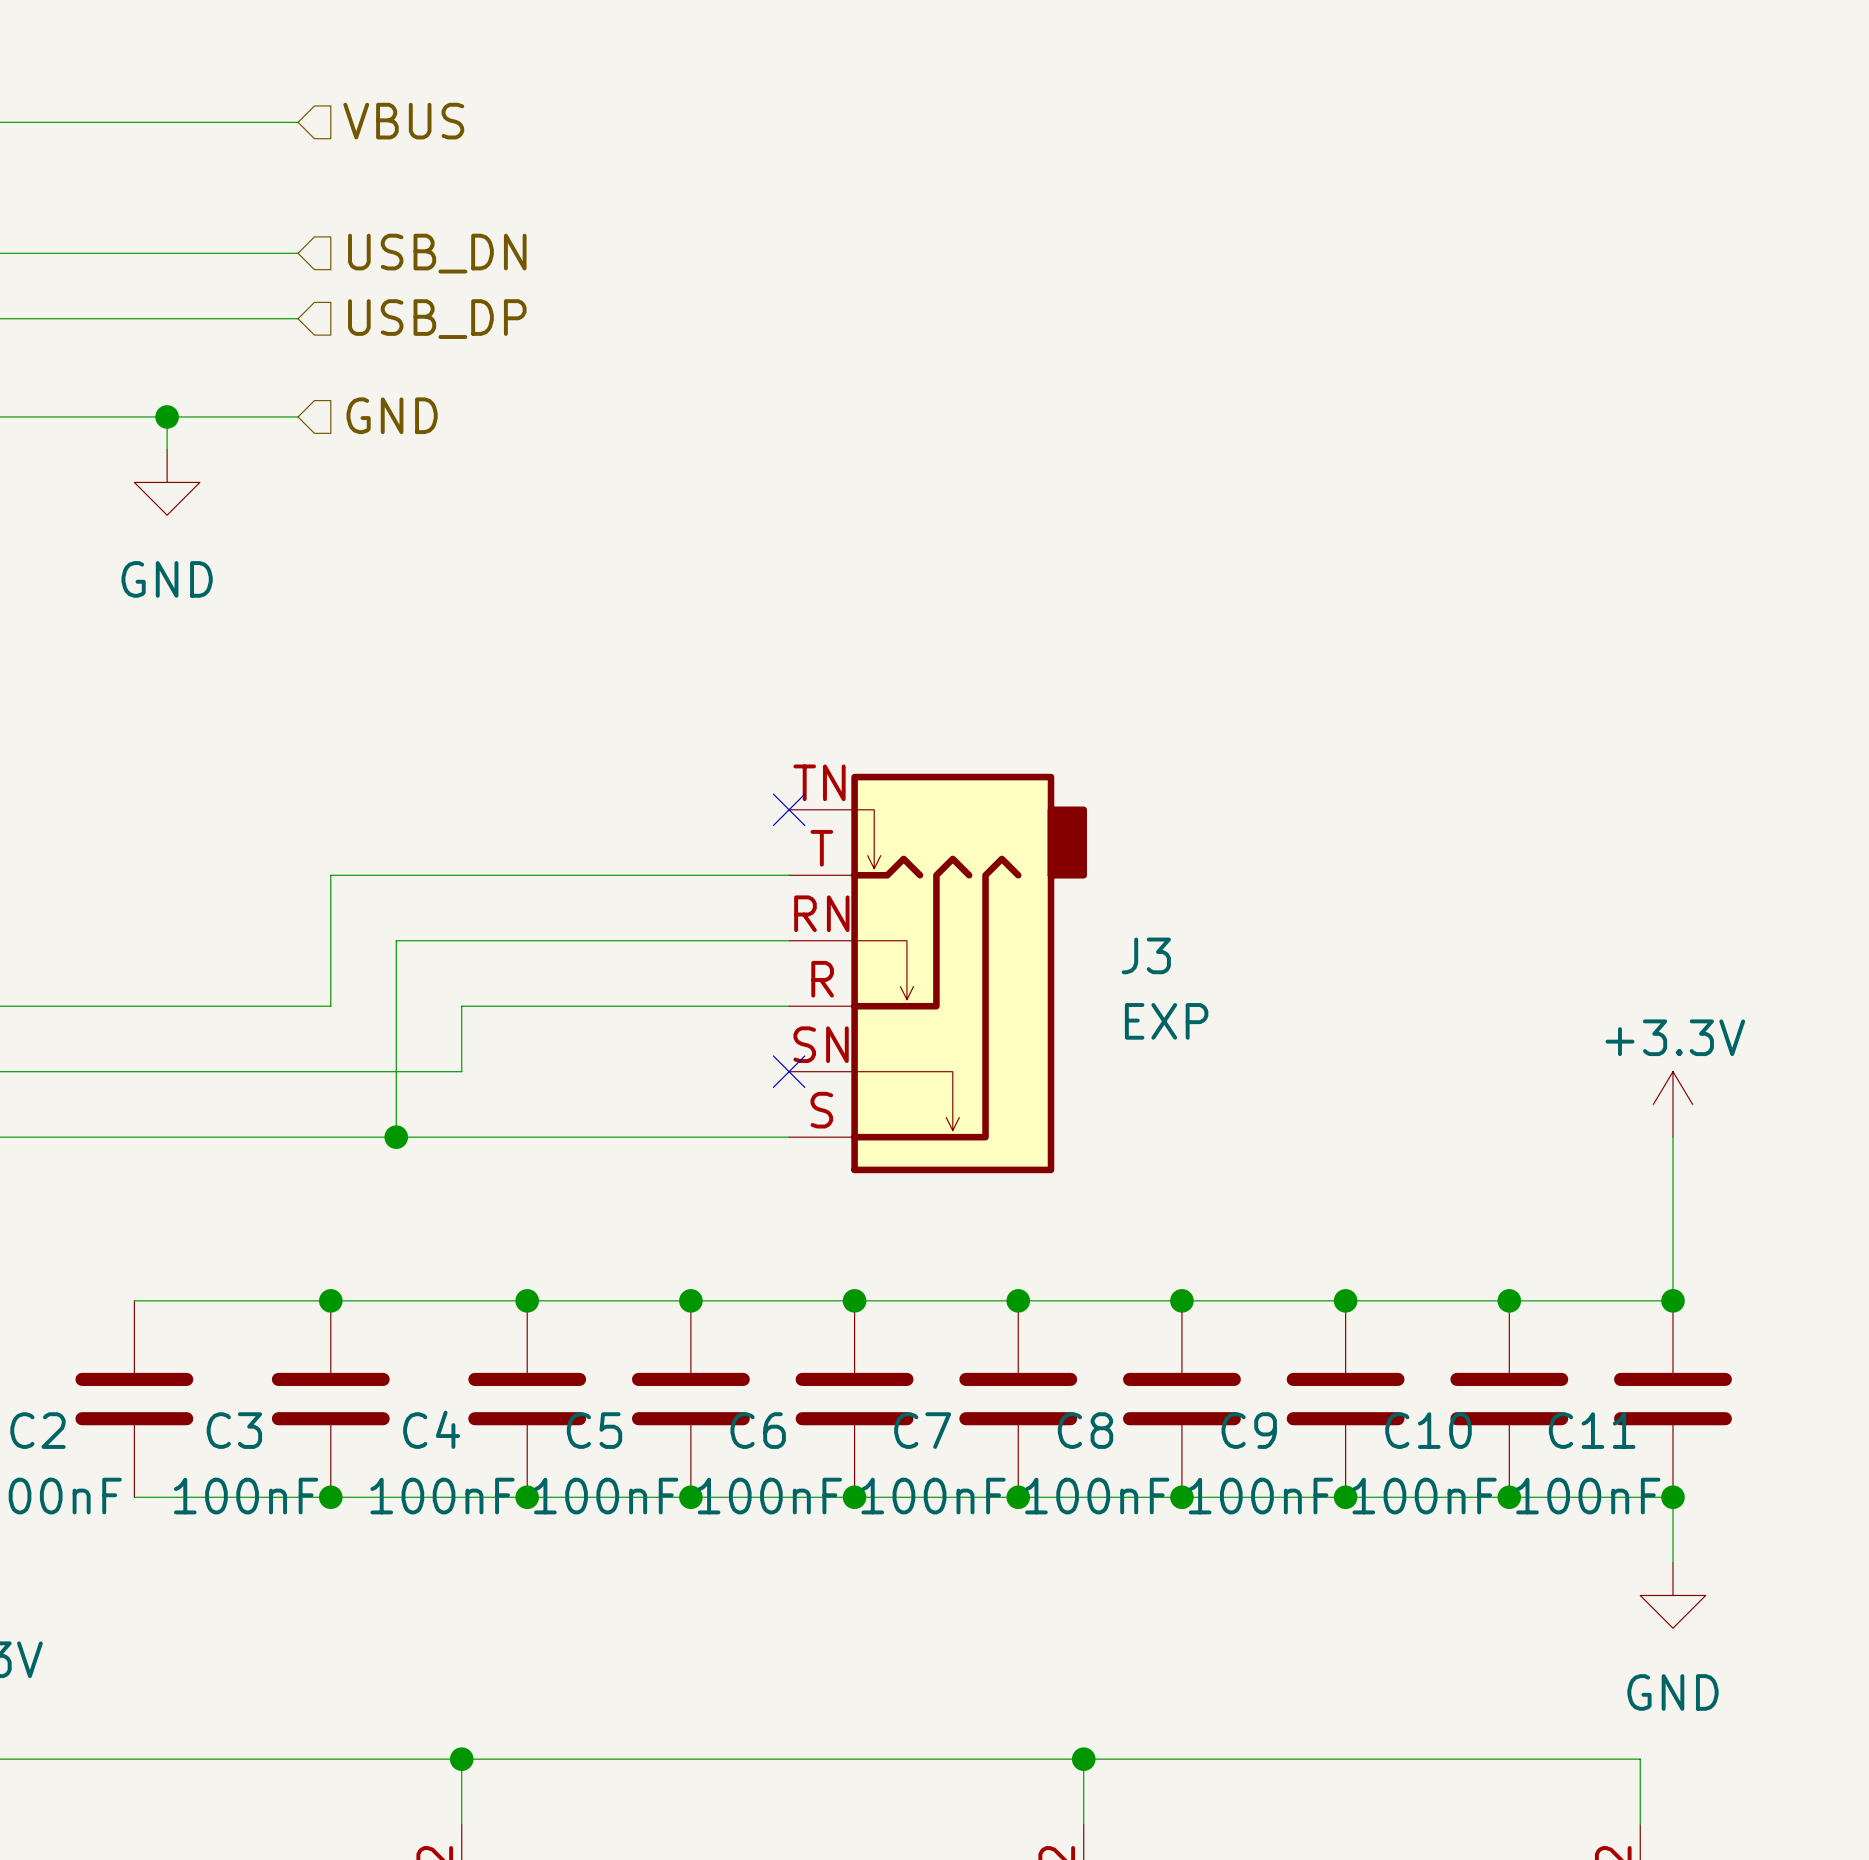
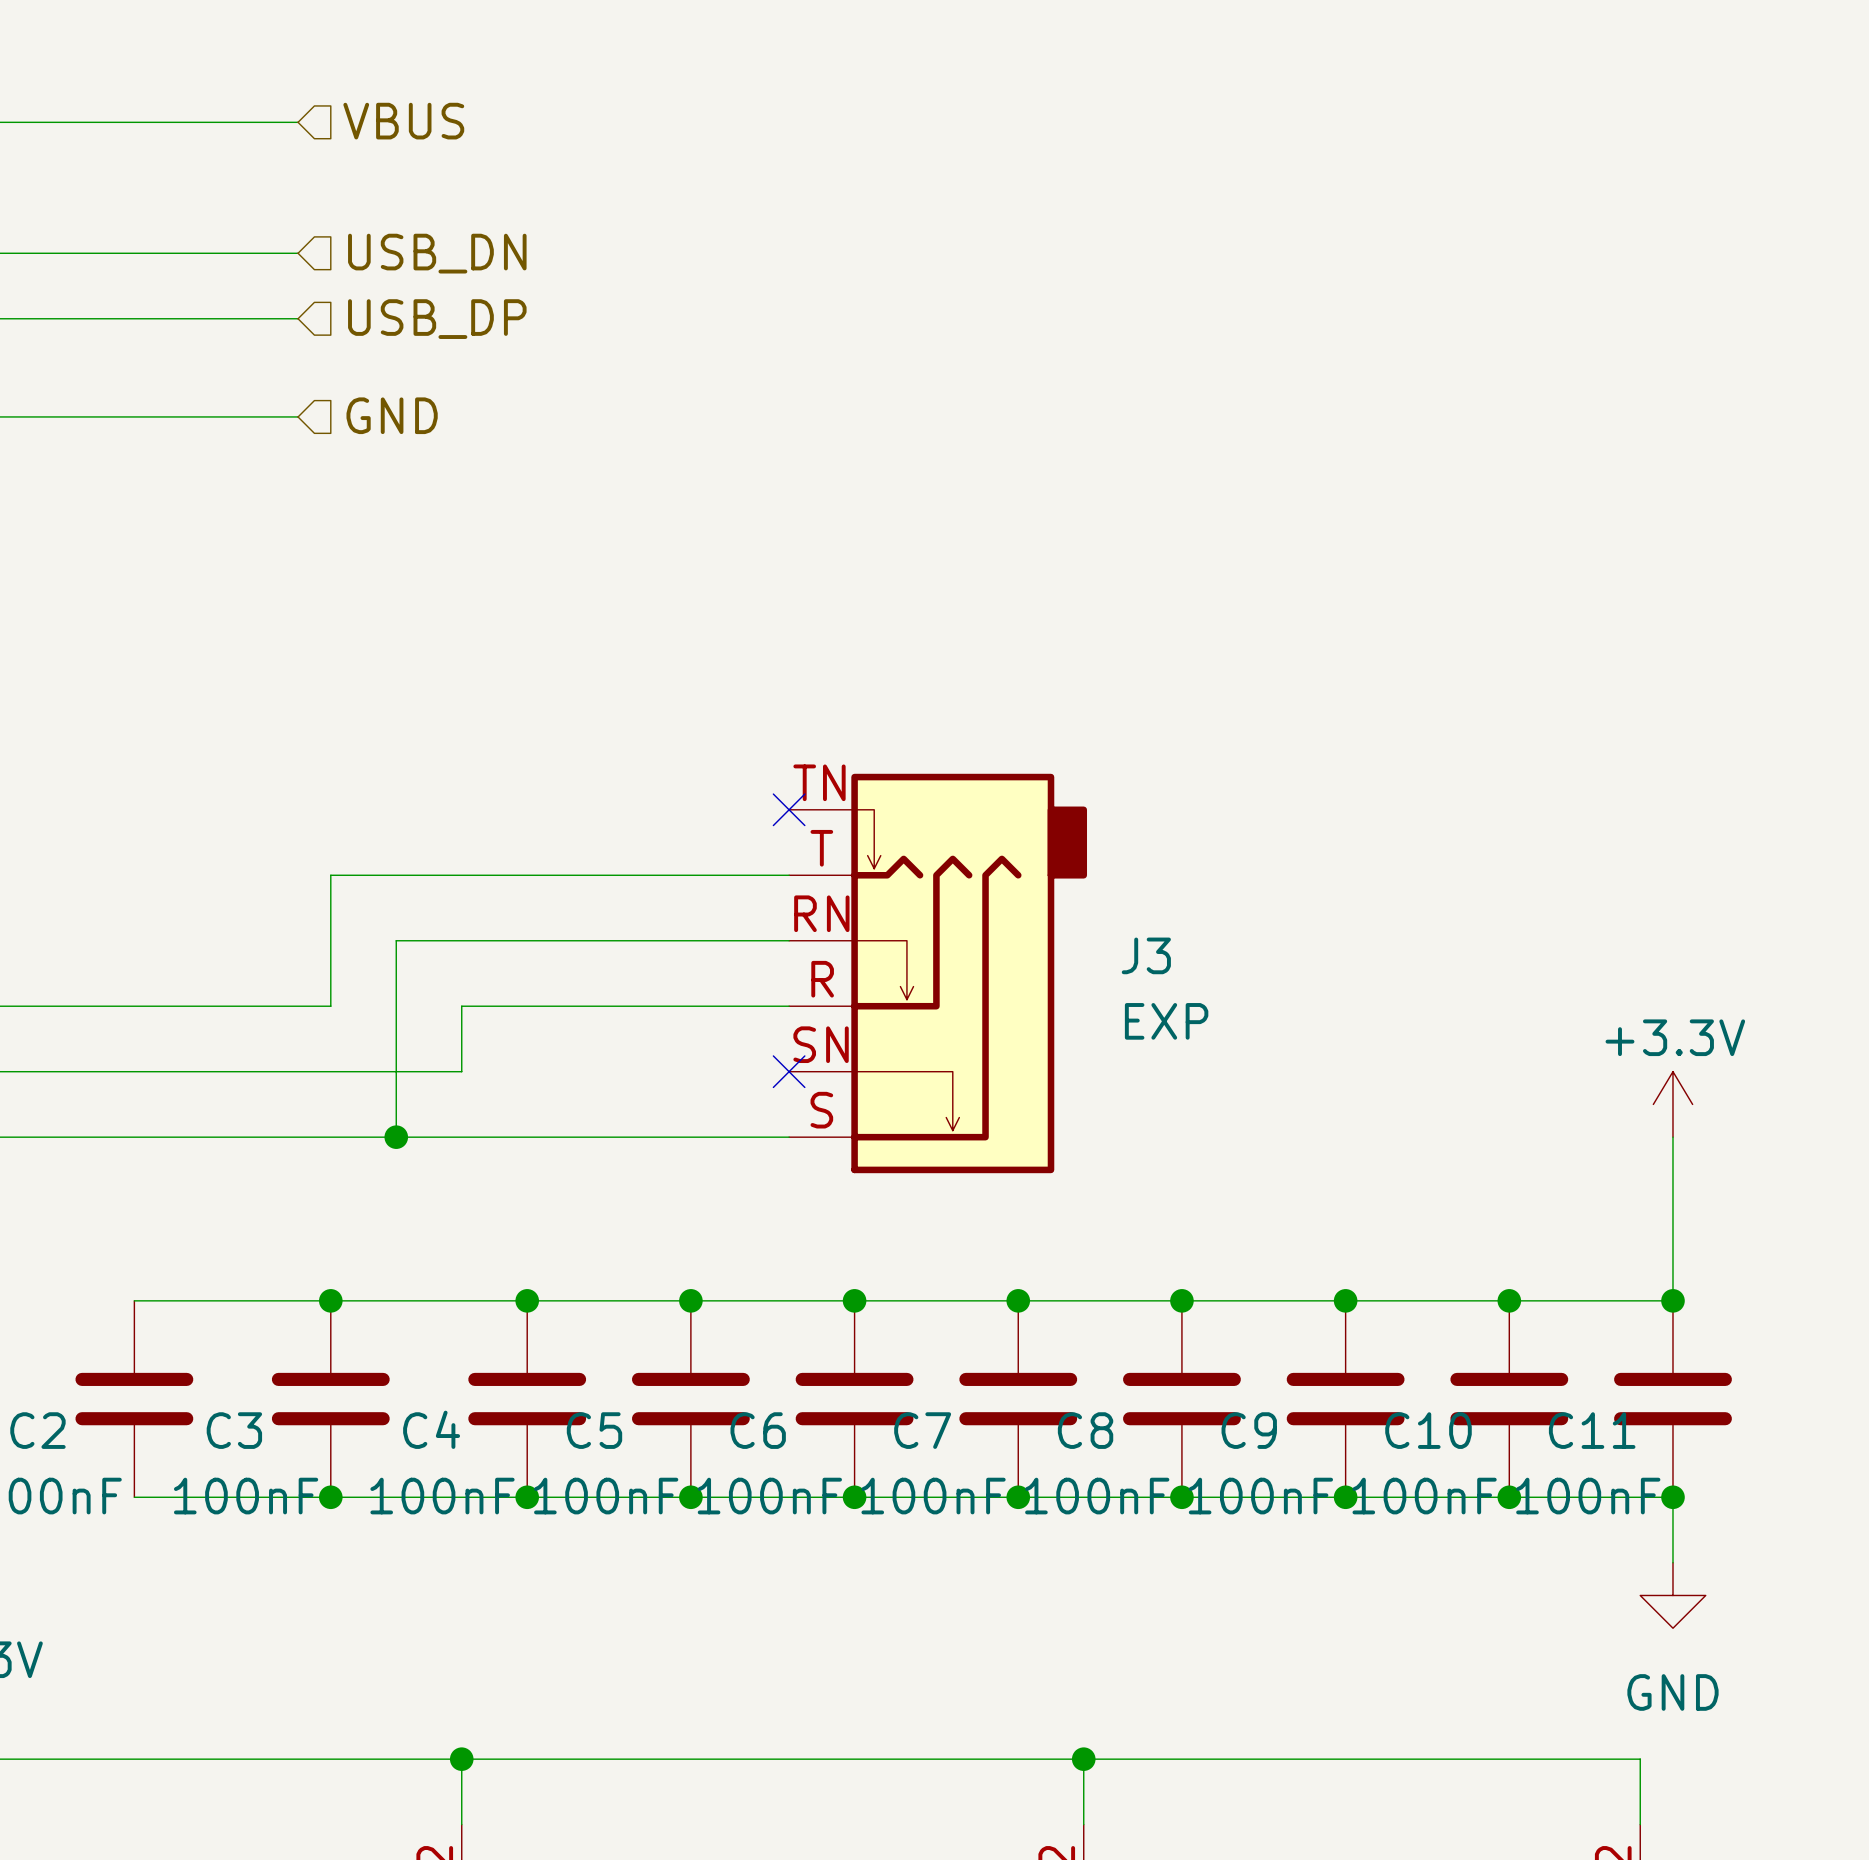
wire: (167, 416) (167, 449) -> none
junction: (167, 416) -> none
power symbol: GND (167, 482) -> none

